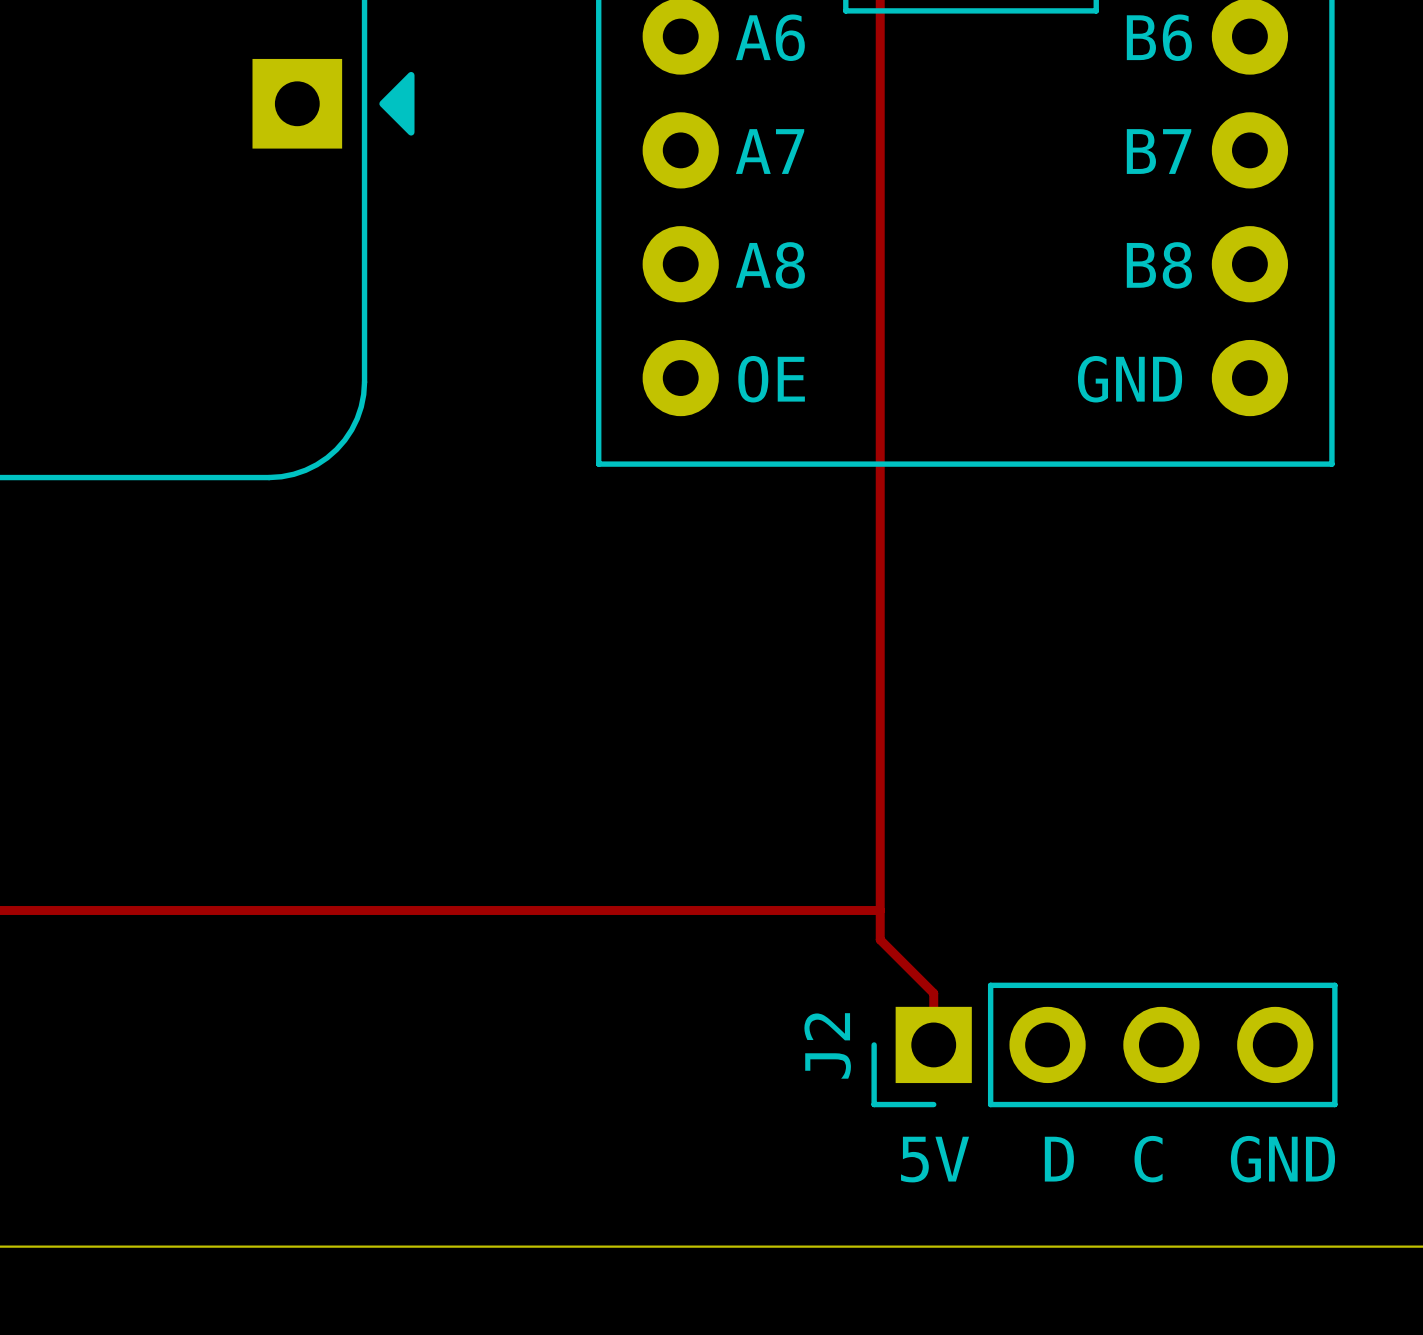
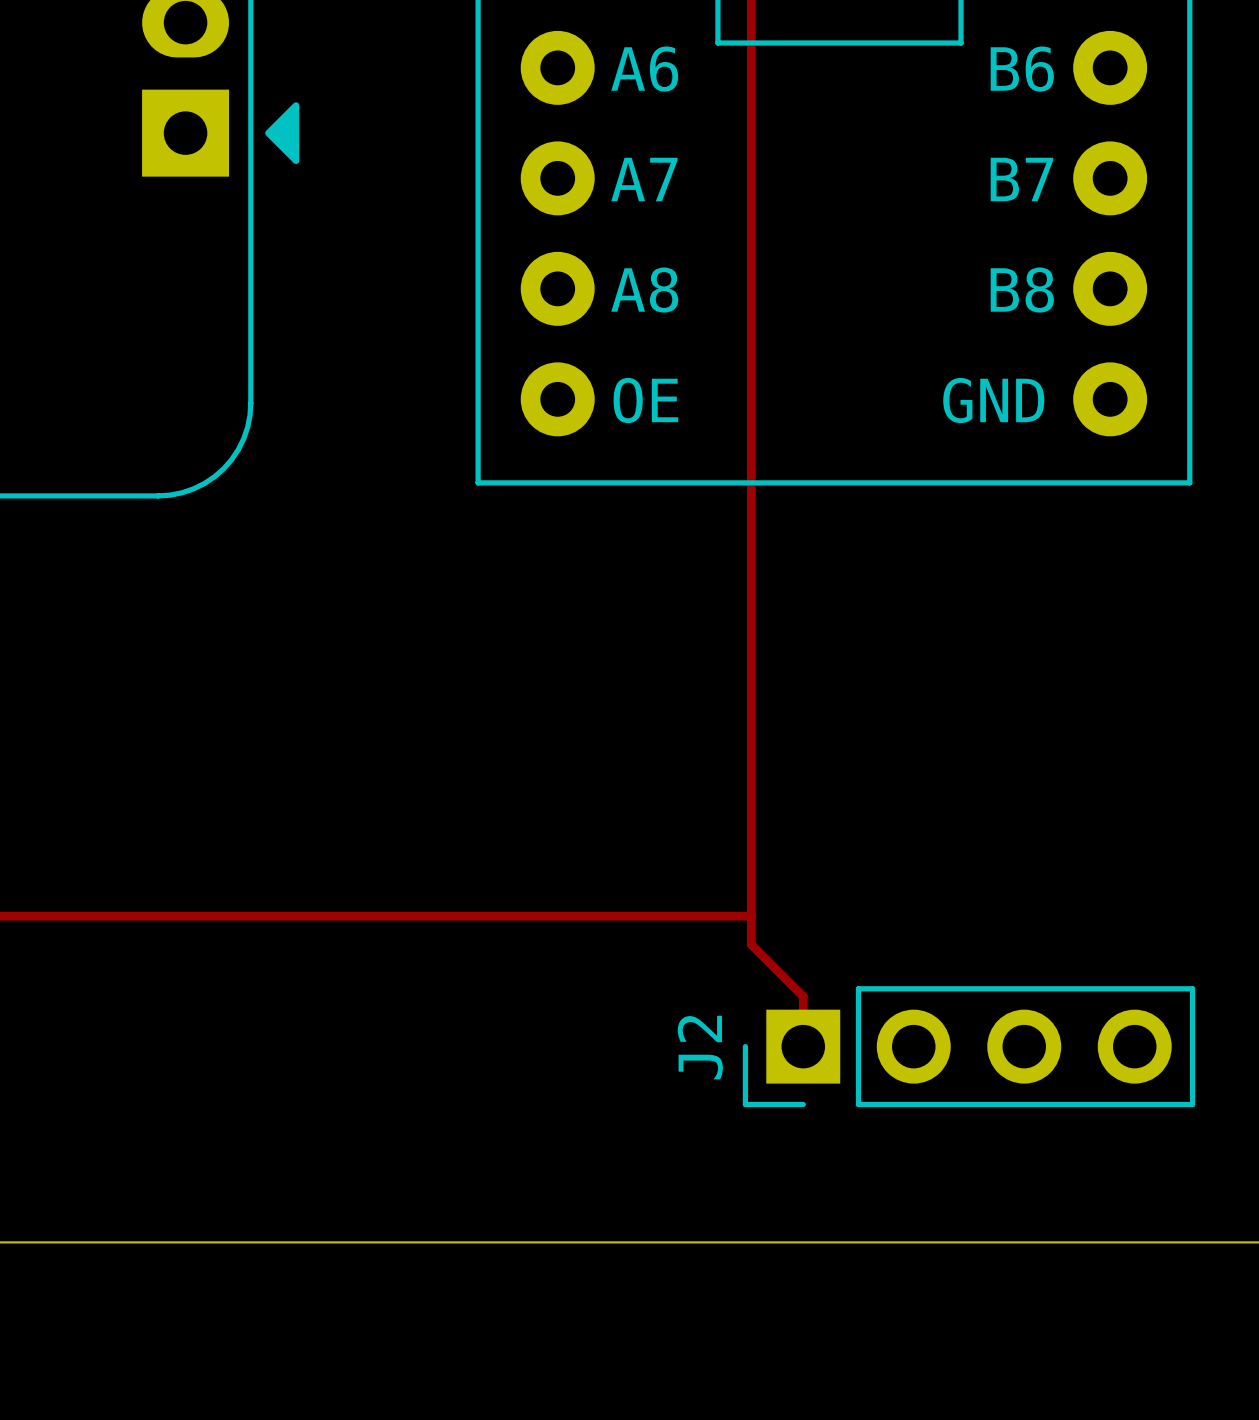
text: 5V (935, 1159) -> none
text: D (1059, 1159) -> none
text: C (1148, 1159) -> none
text: GND (1282, 1159) -> none

